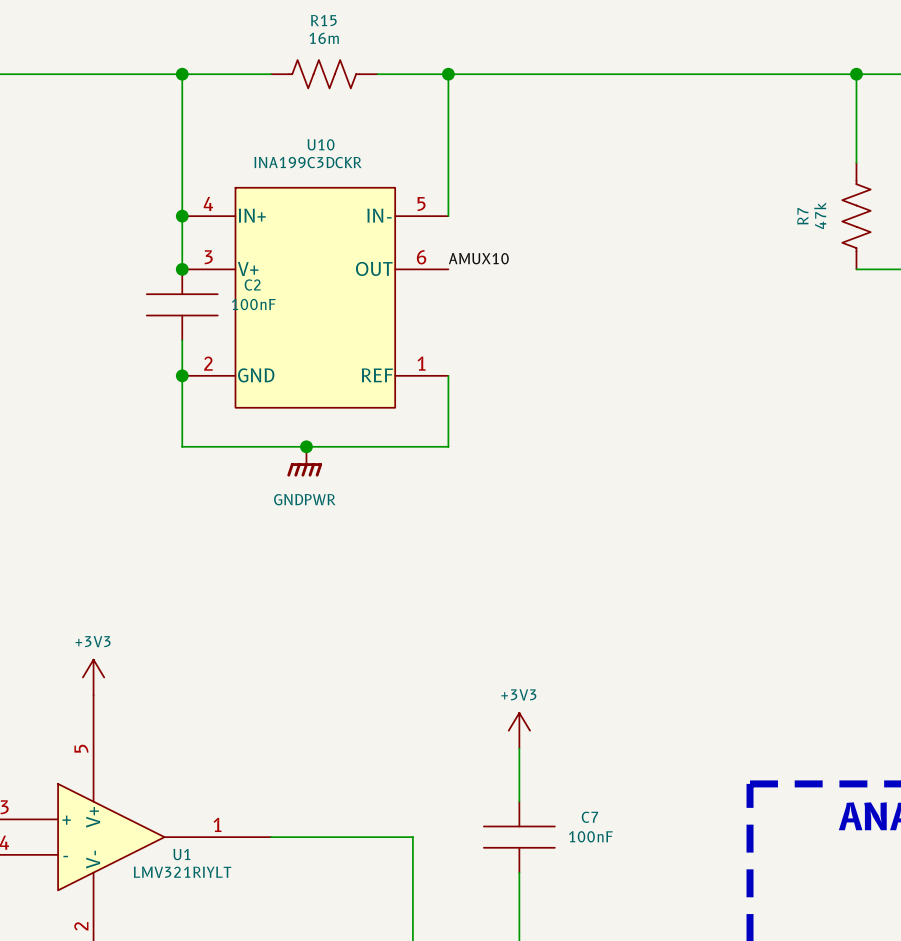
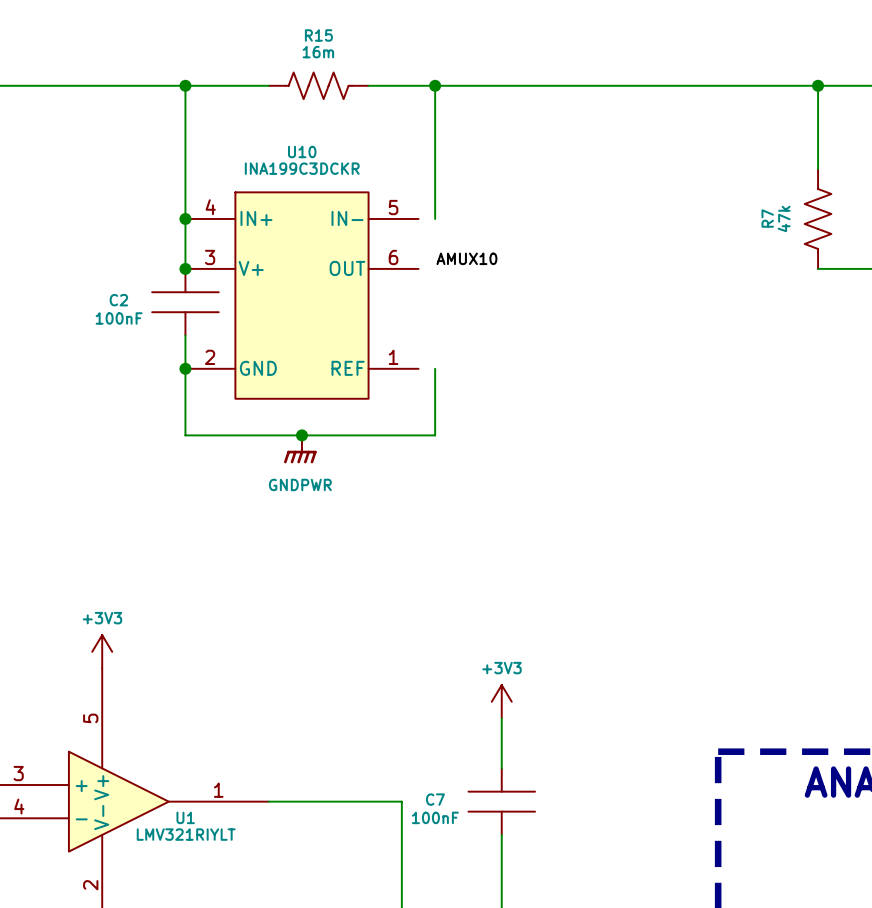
U10 symbol: [182, 187, 449, 408] -> [185, 192, 419, 399]
C2 name position: C2 (252, 285) -> C2 (118, 300)
C2 value position: 100nF (253, 304) -> 100nF (119, 318)
C7 name position: C7 (589, 817) -> C7 (435, 799)
C7 value position: 100nF (590, 836) -> 100nF (435, 817)

